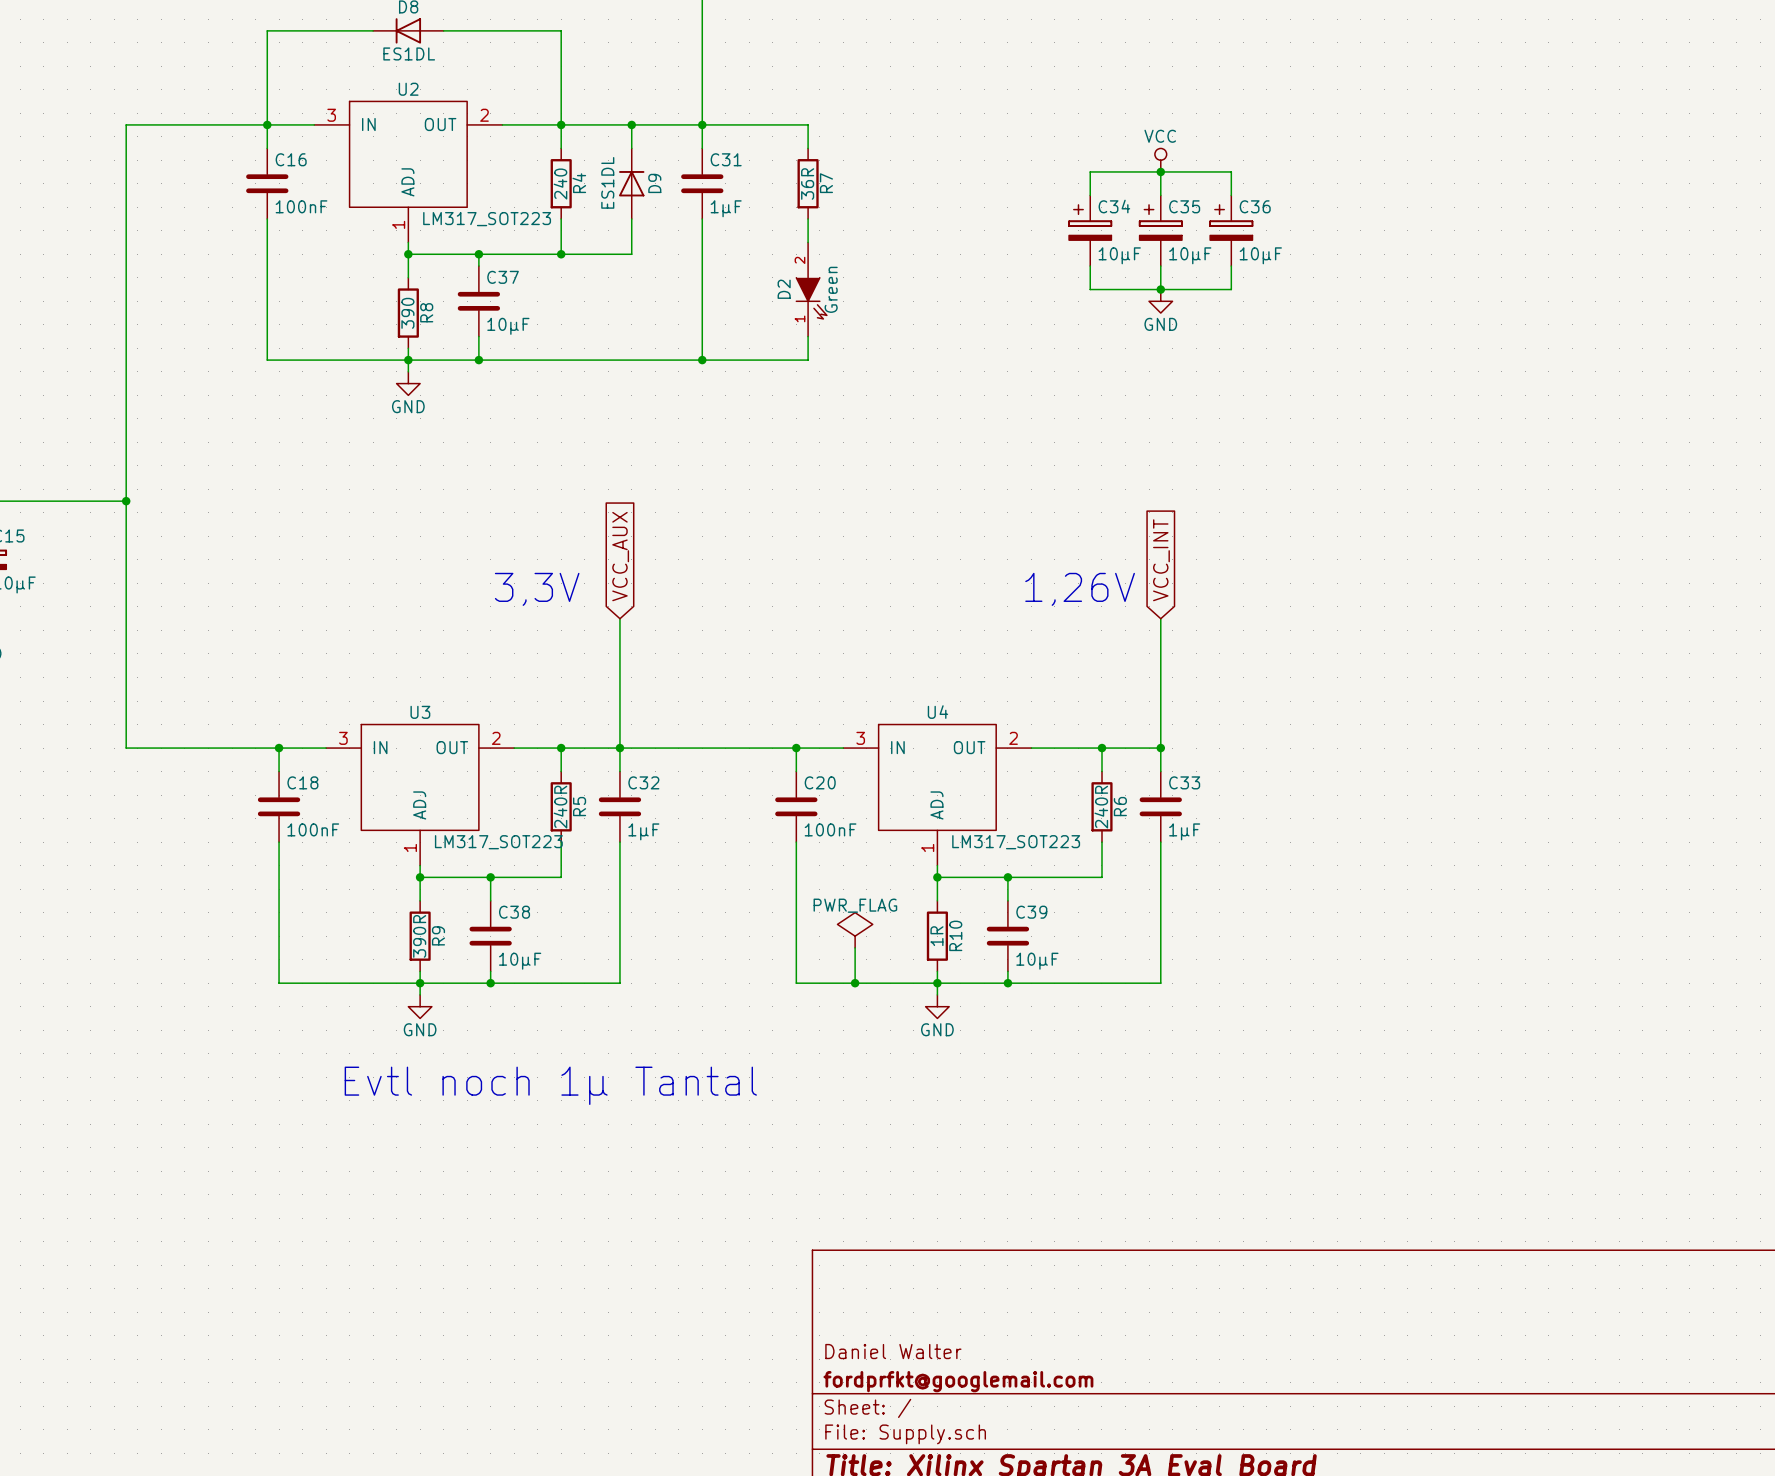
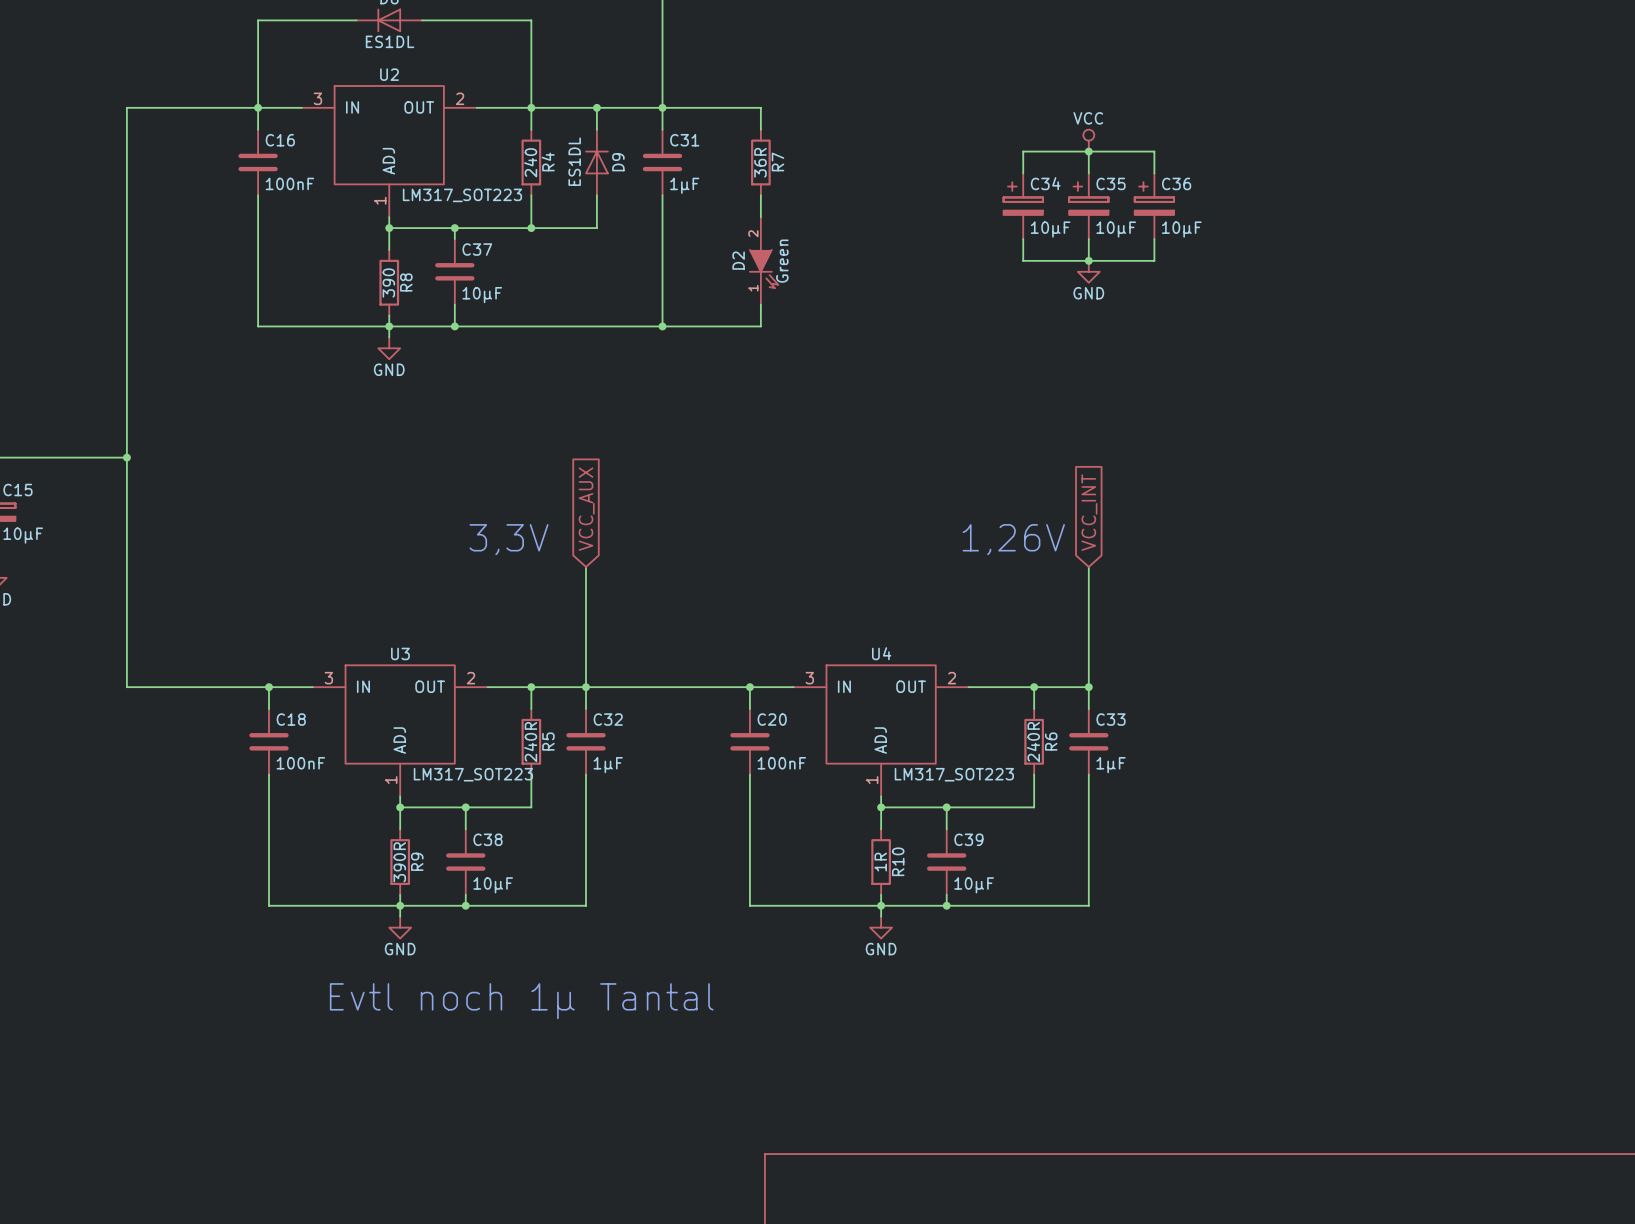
power symbol: PWR_FLAG (855, 930) -> none
wire: (855, 947) (855, 983) -> none
junction: (855, 983) -> none

